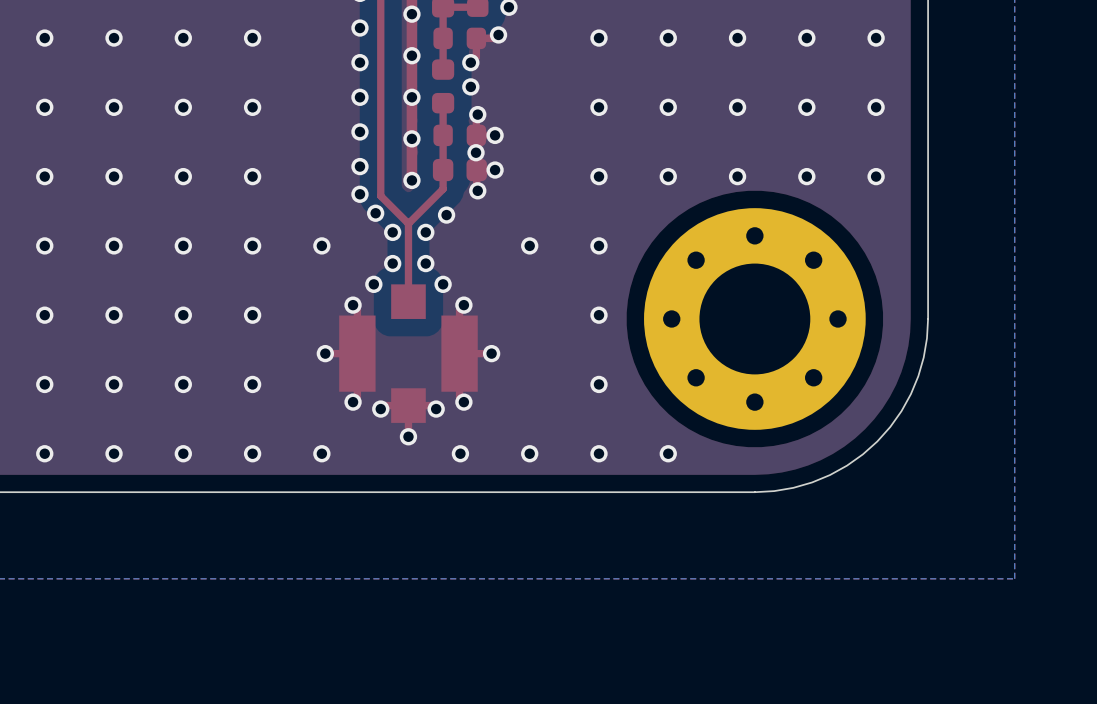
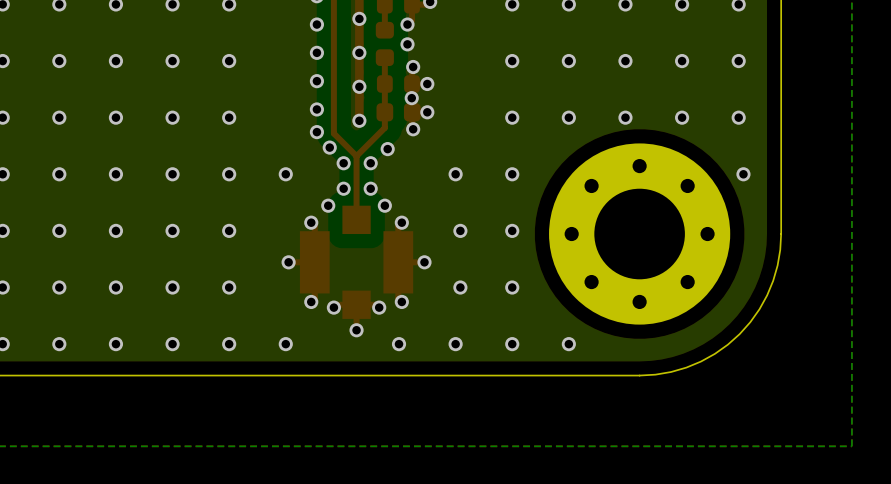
via: none -> (743, 174)
via: none -> (460, 230)
via: none -> (460, 287)

